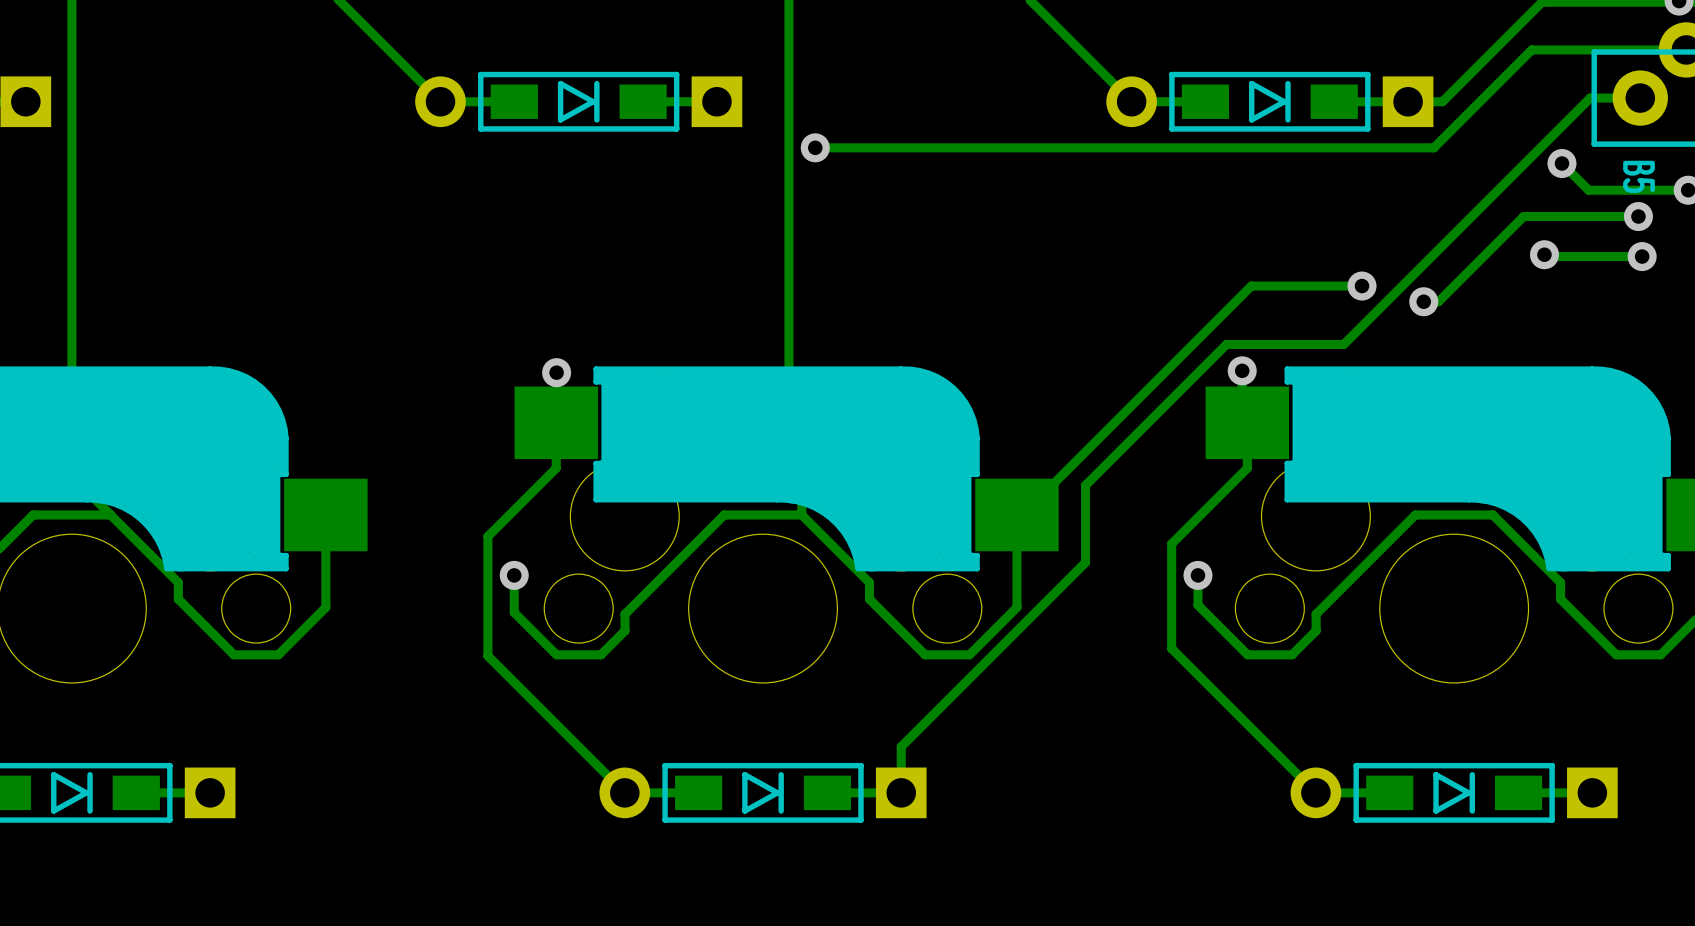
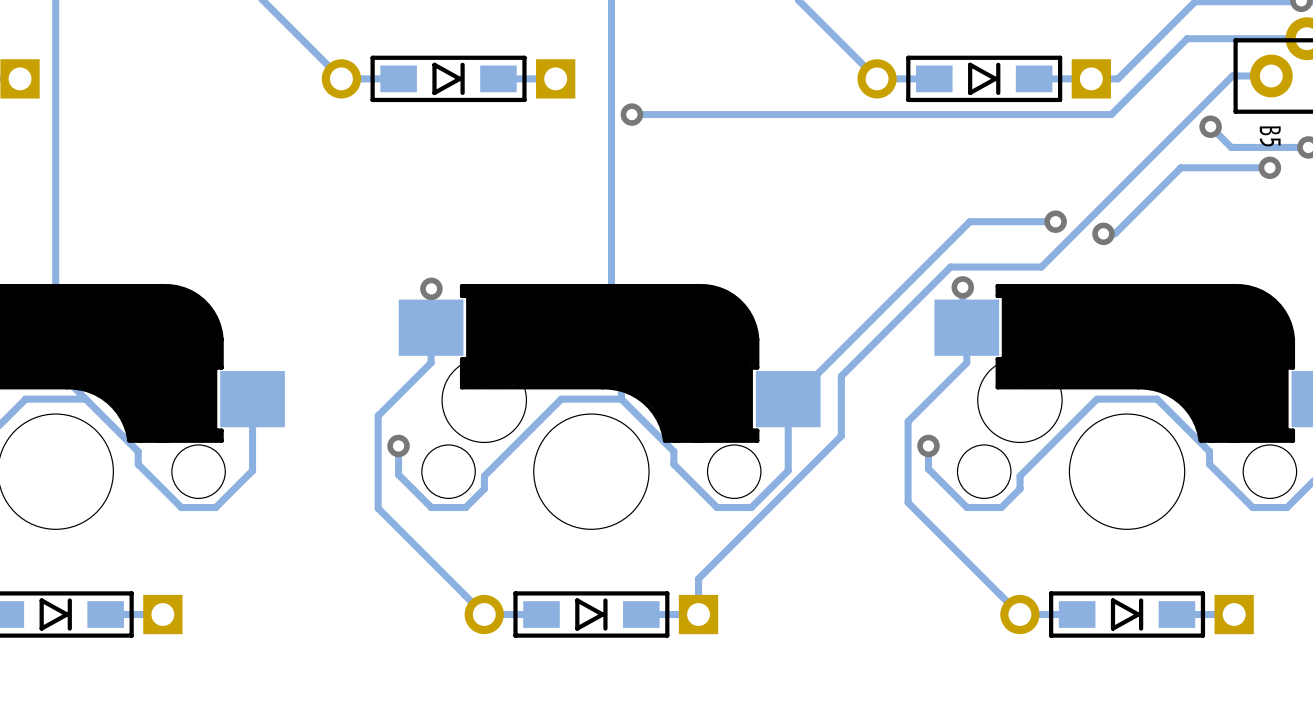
track: (1544, 254) (1546, 256) (1642, 256) -> none
via: (1544, 254) -> none
via: (1642, 256) -> none

